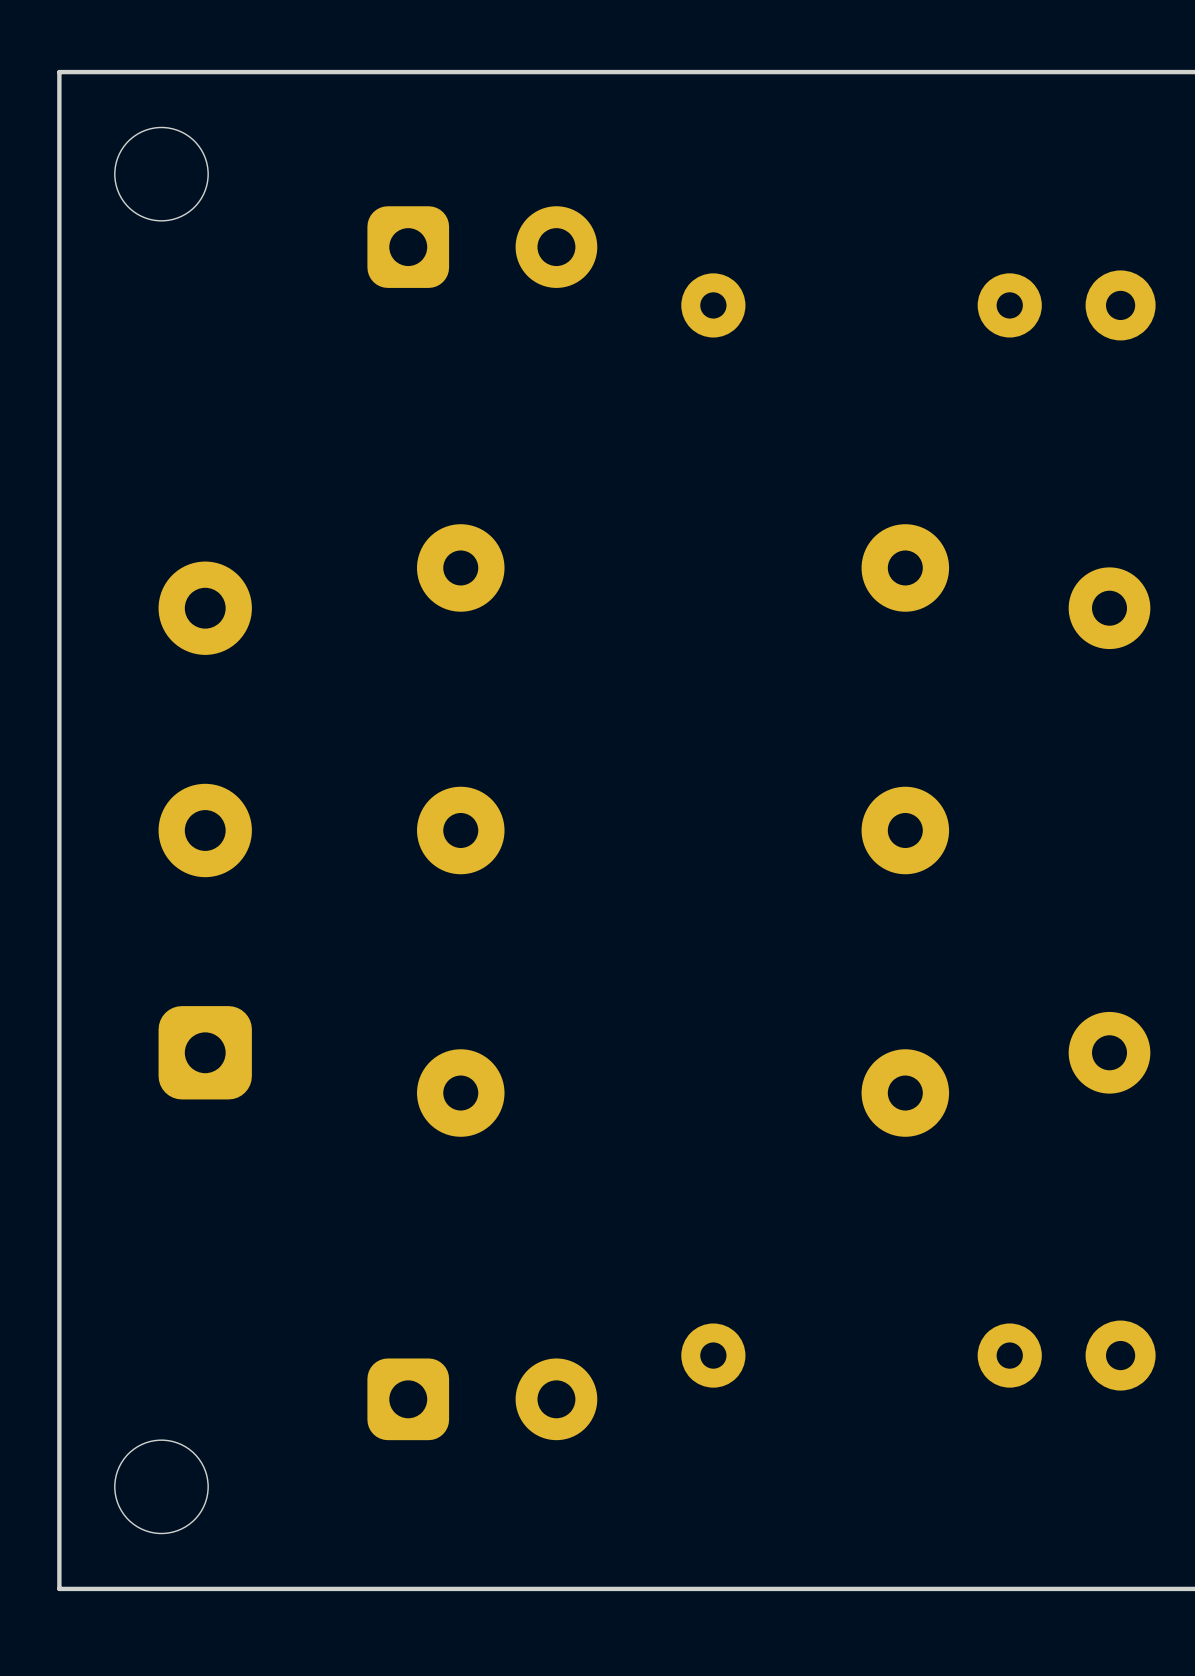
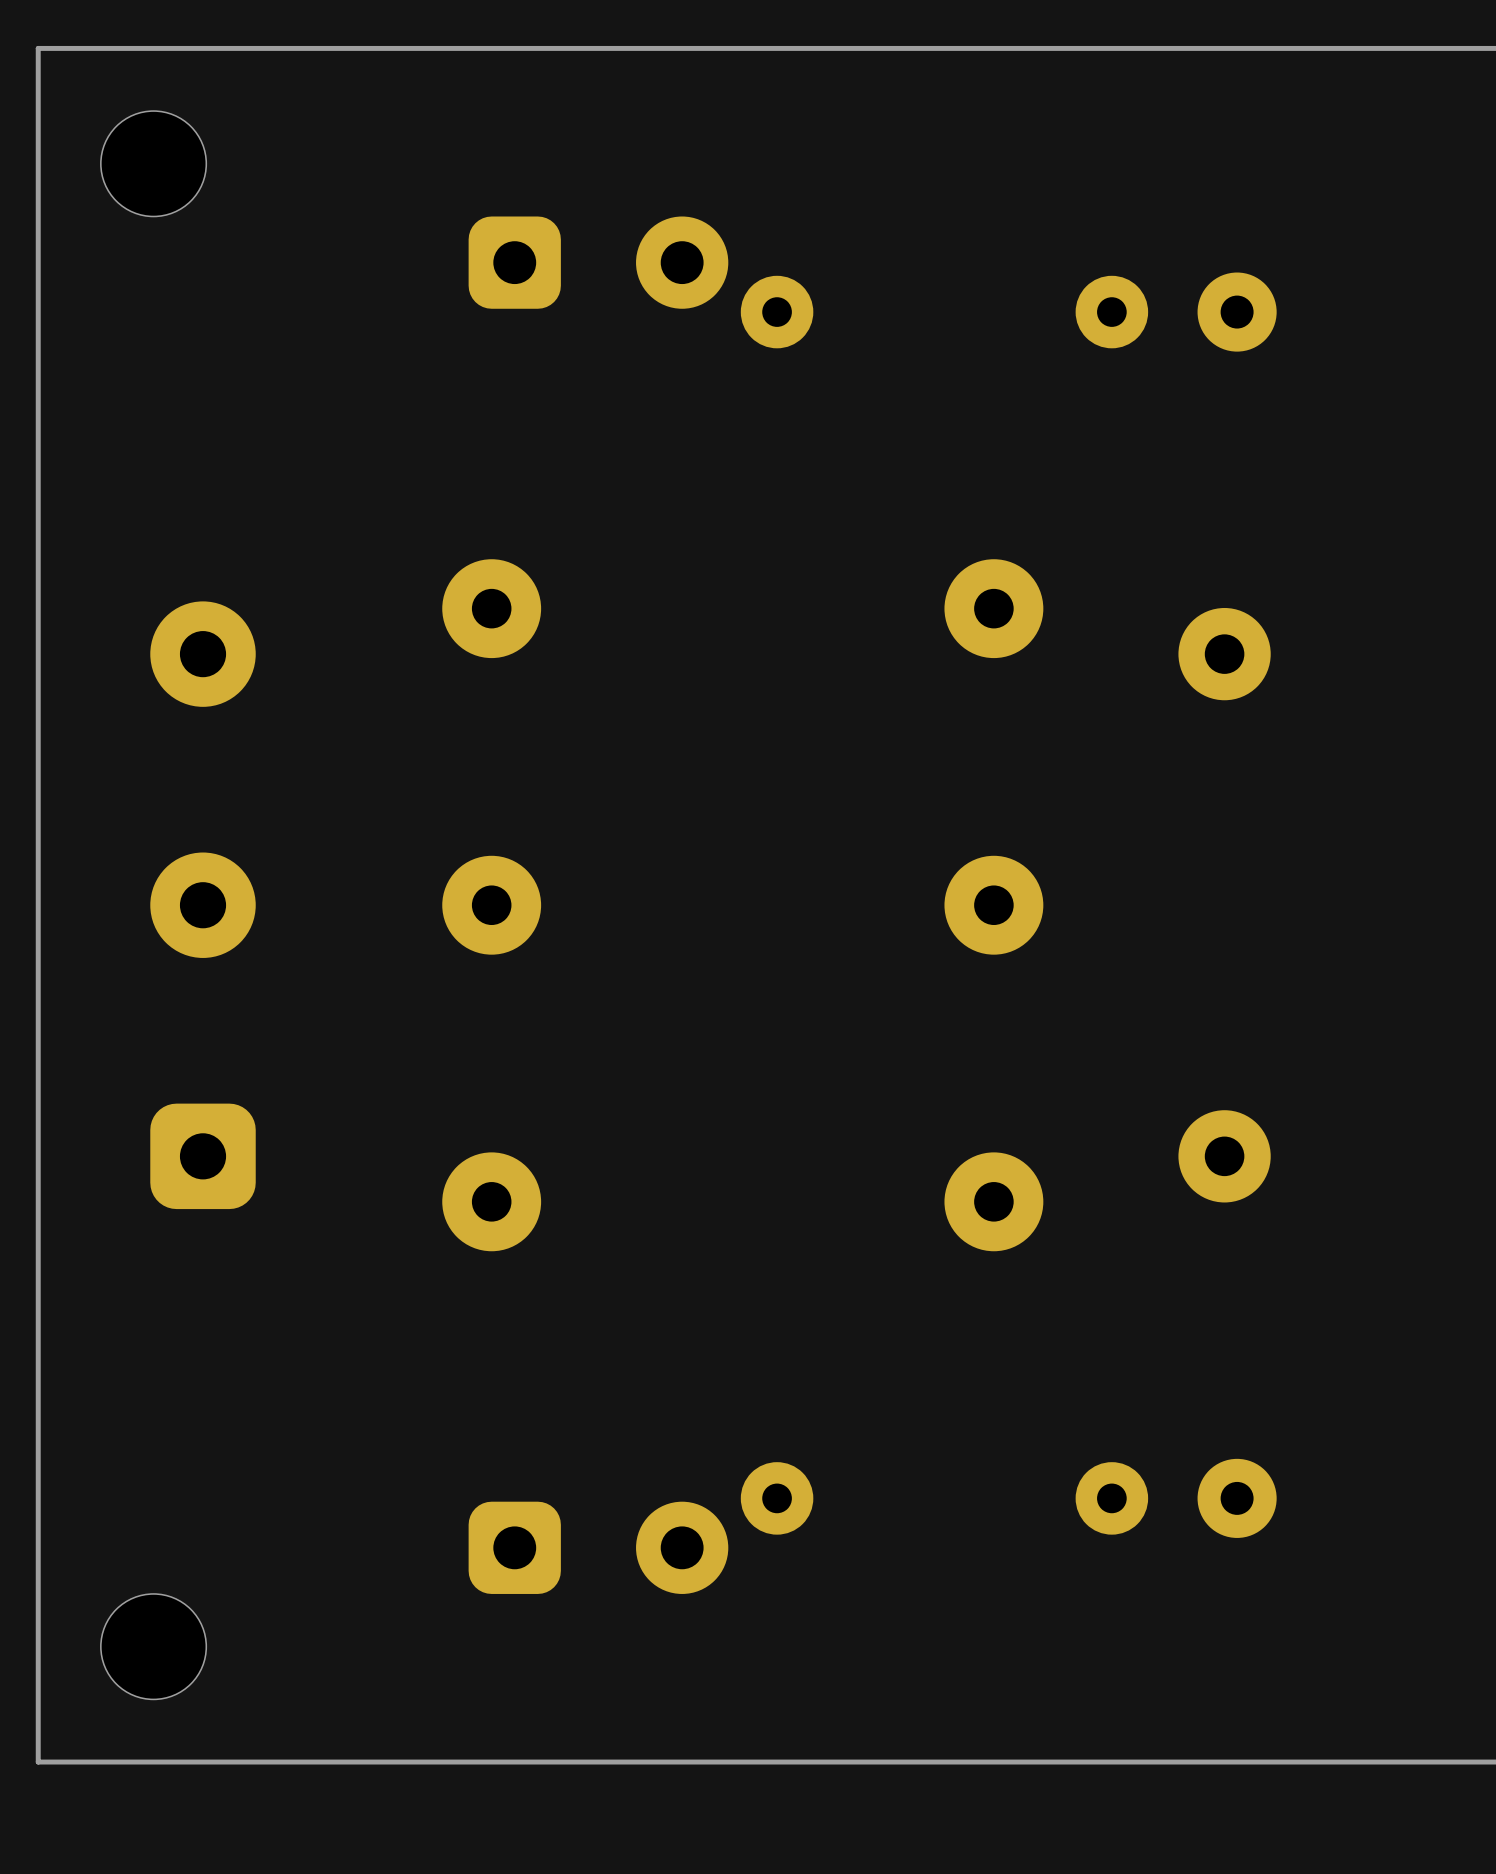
part position: (482, 247) -> (598, 262)
part position: (482, 1399) -> (598, 1547)

